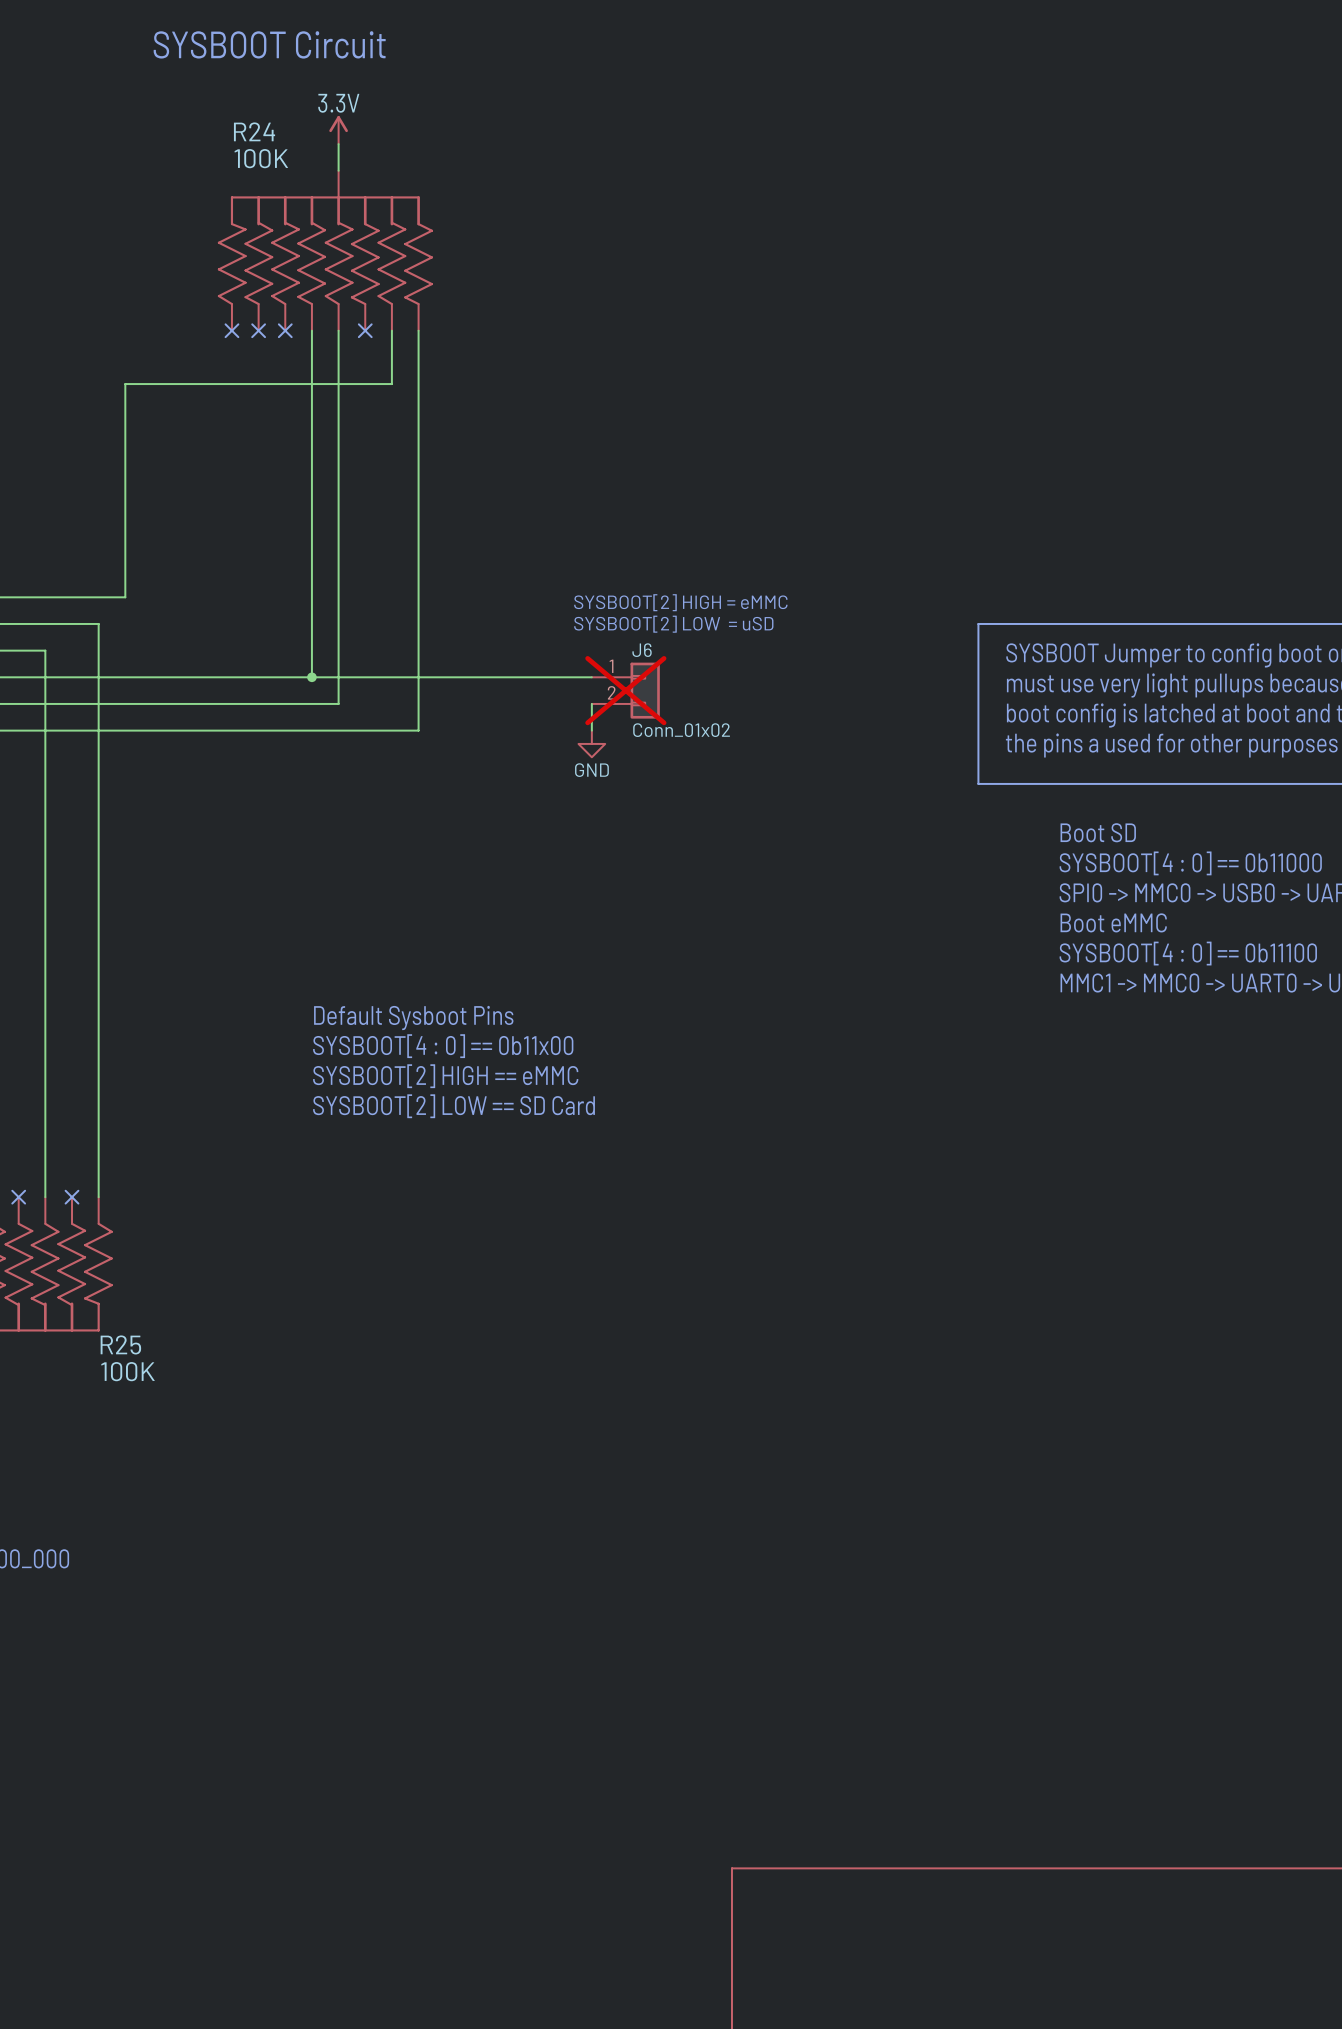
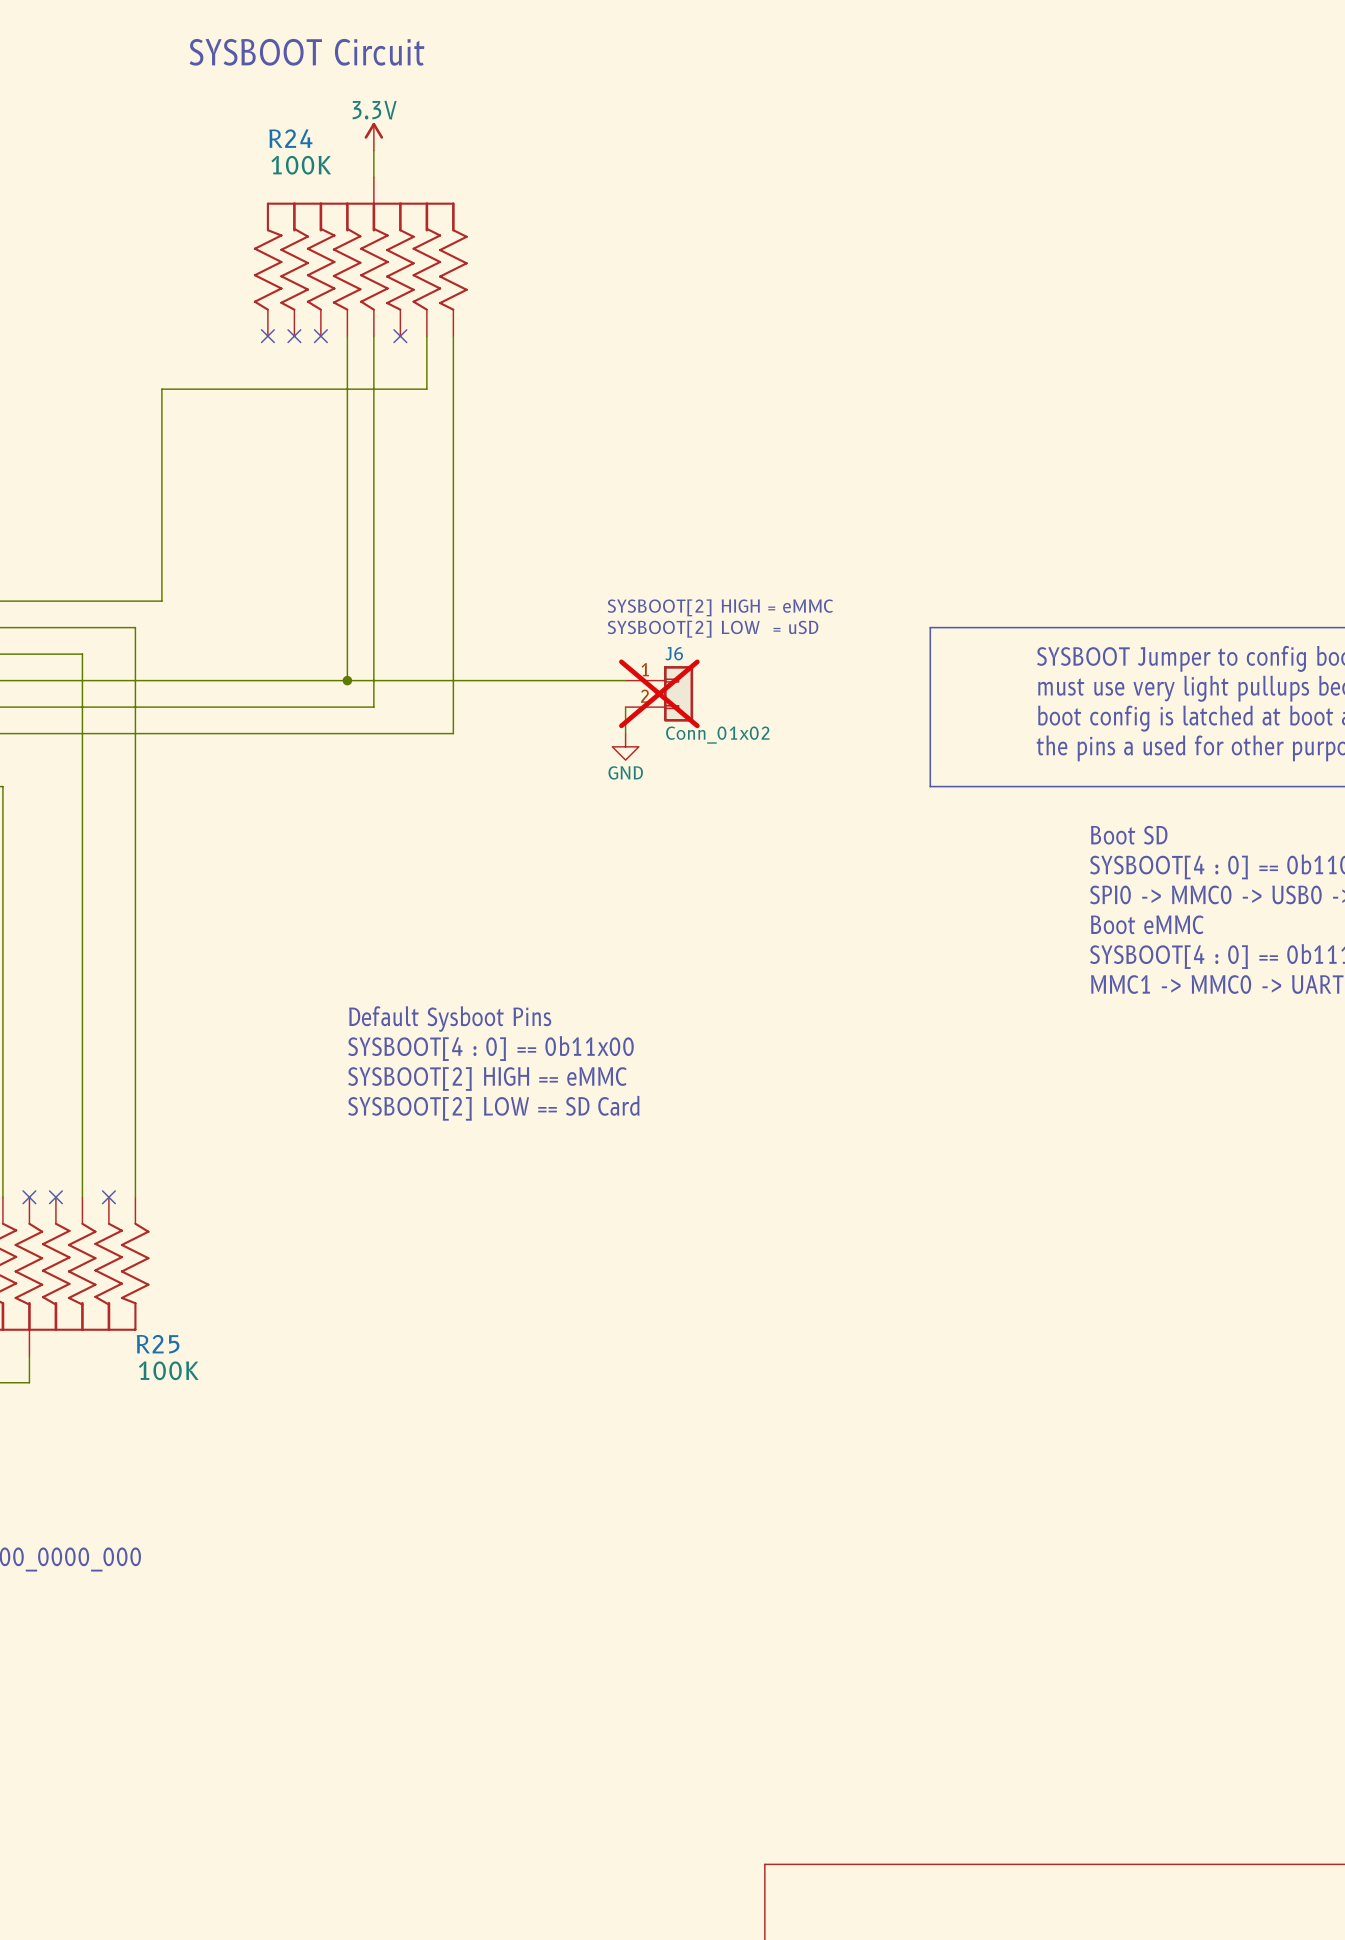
line: (978, 623) (978, 783) -> (1009, 627) (930, 627) (930, 786) (1009, 786)

